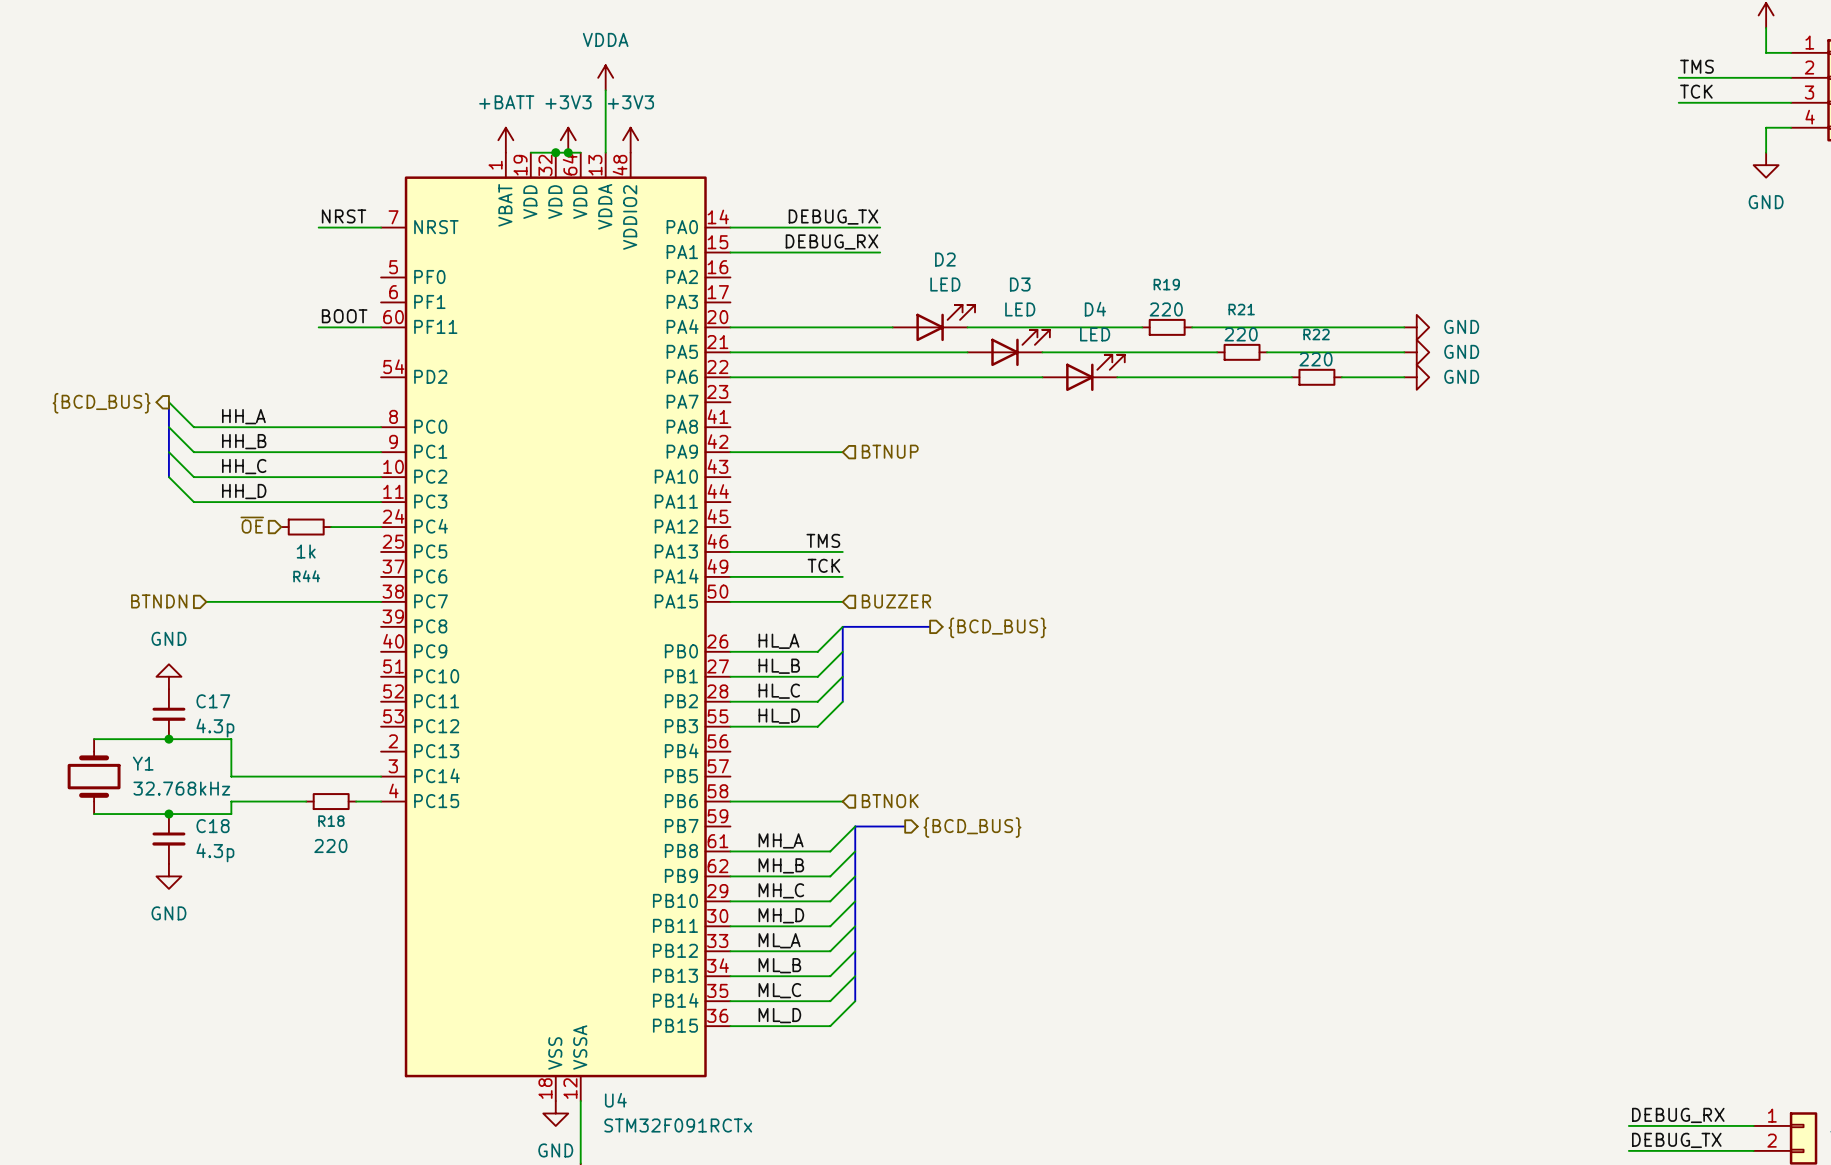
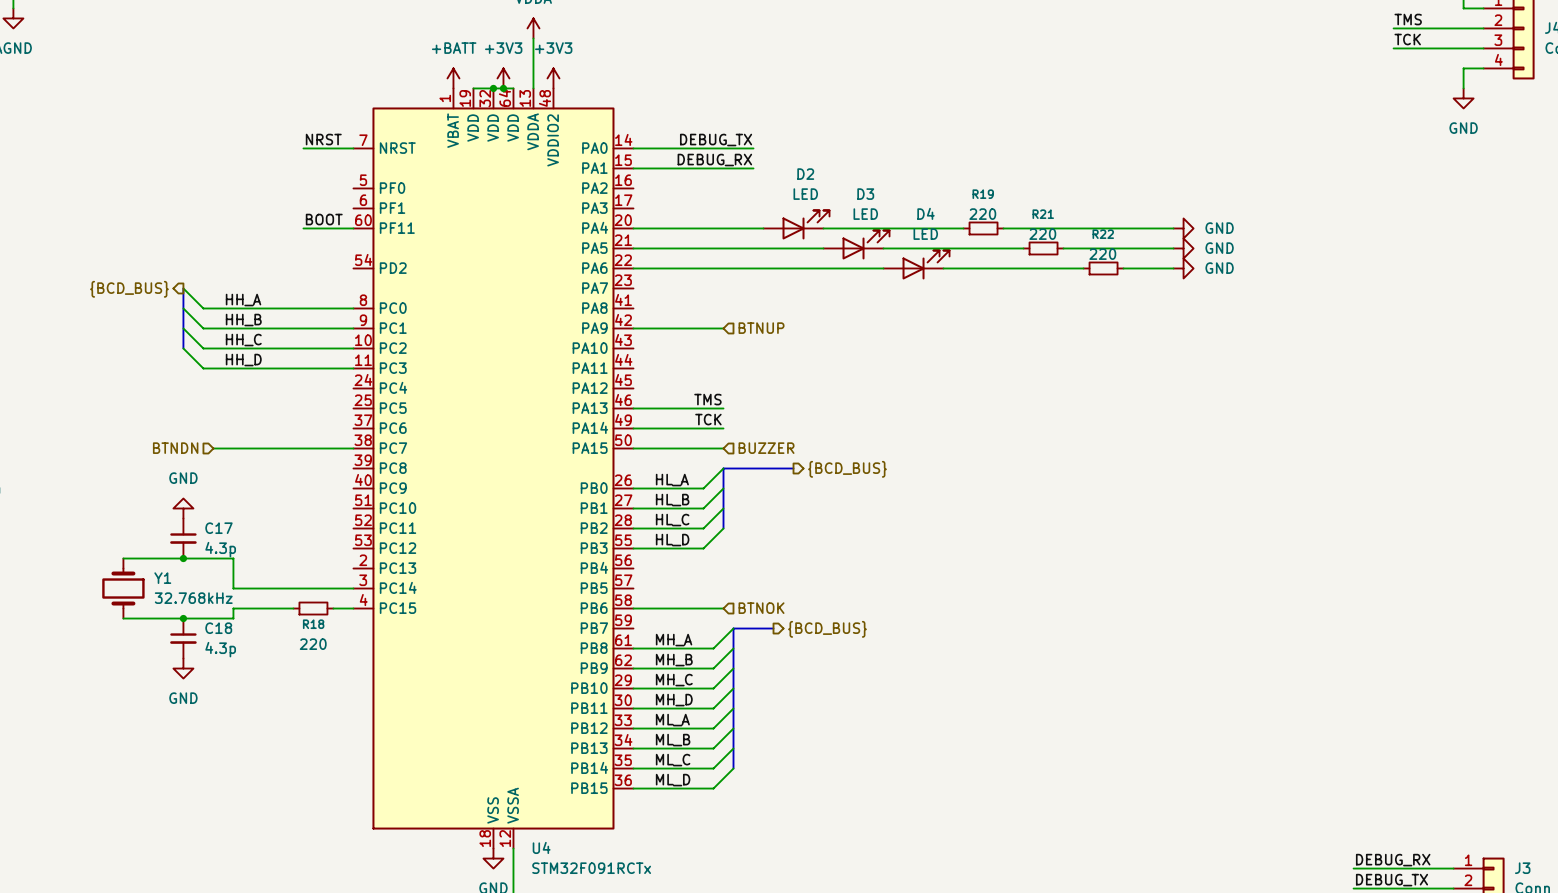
hierarchical label: ~{OE} (252, 525) -> none
R44: 1k (306, 527) -> none
wire: (331, 527) (381, 527) -> none

